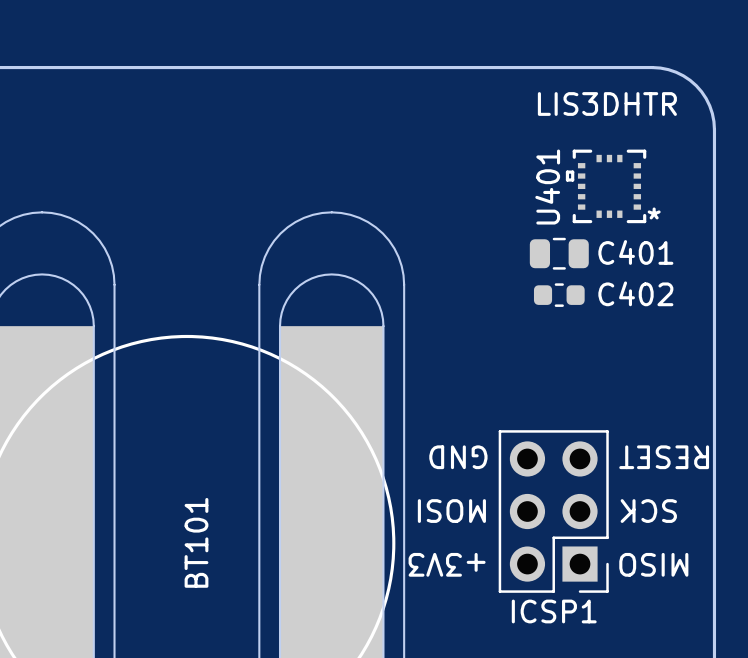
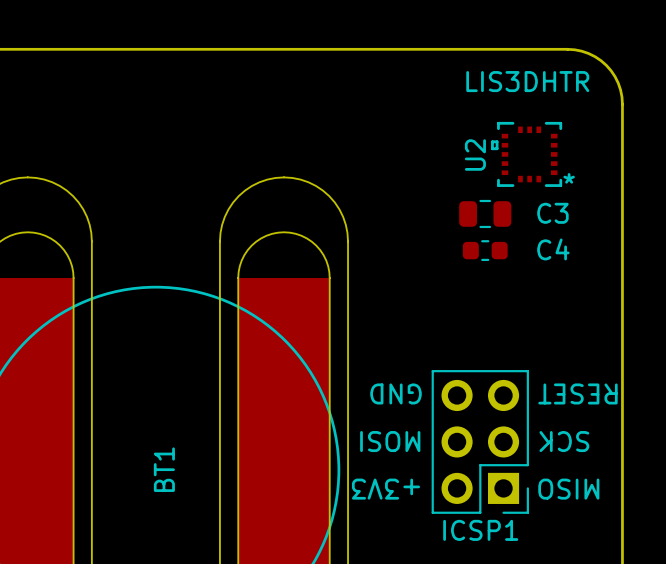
U401 name: U401 (547, 187) -> U2 (475, 155)
C401 name: C401 (635, 252) -> C3 (552, 213)
C402 name: C402 (635, 293) -> C4 (553, 249)
BT101 name: BT101 (196, 542) -> BT1 (164, 469)

